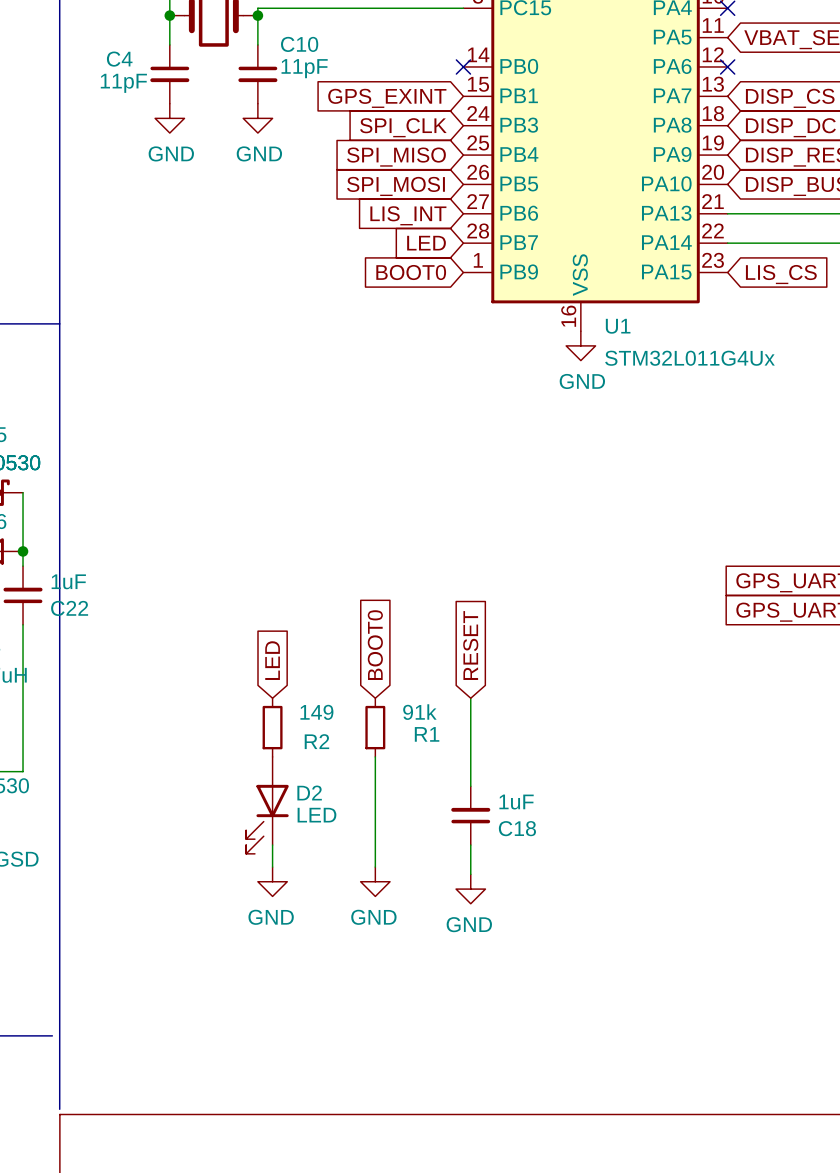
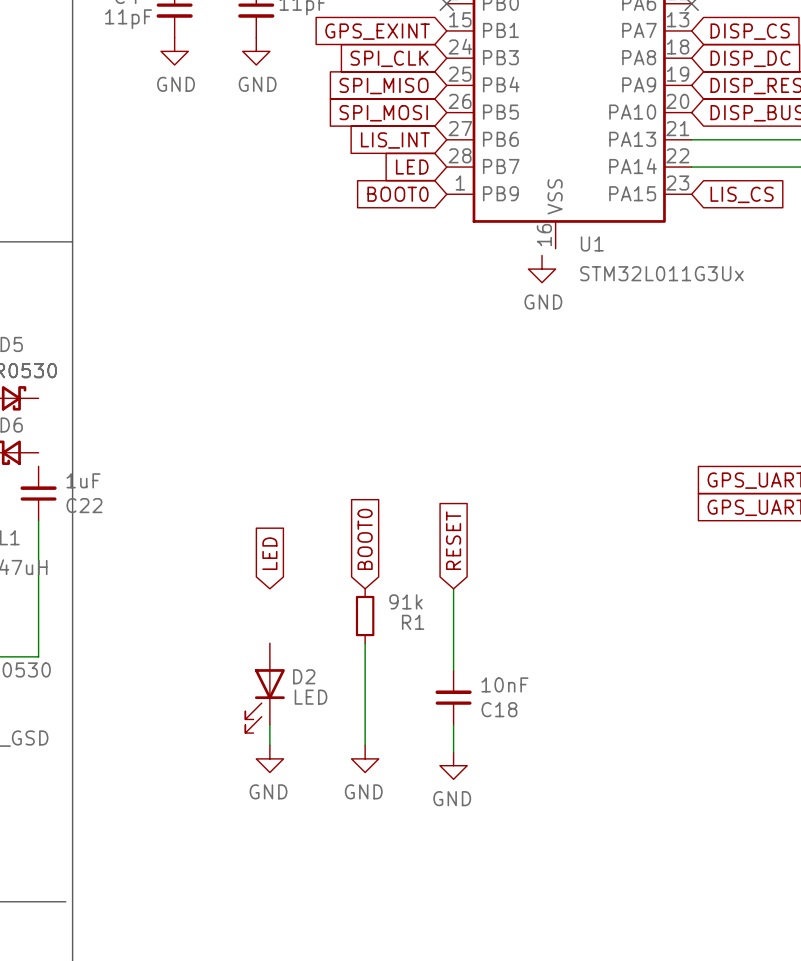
power symbol position: GND (580, 345) -> GND (542, 269)
U1 value: STM32L011G4Ux (689, 358) -> STM32L011G3Ux (661, 273)
wire: (23, 492) (23, 566) -> none
junction: (23, 551) -> none
R2: 149 (272, 727) -> none
C18 value: 1uF (516, 802) -> 10nF (504, 684)

